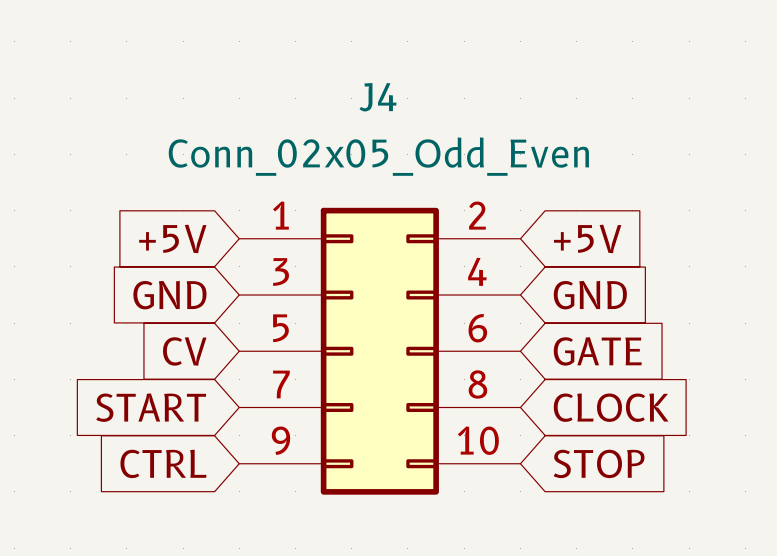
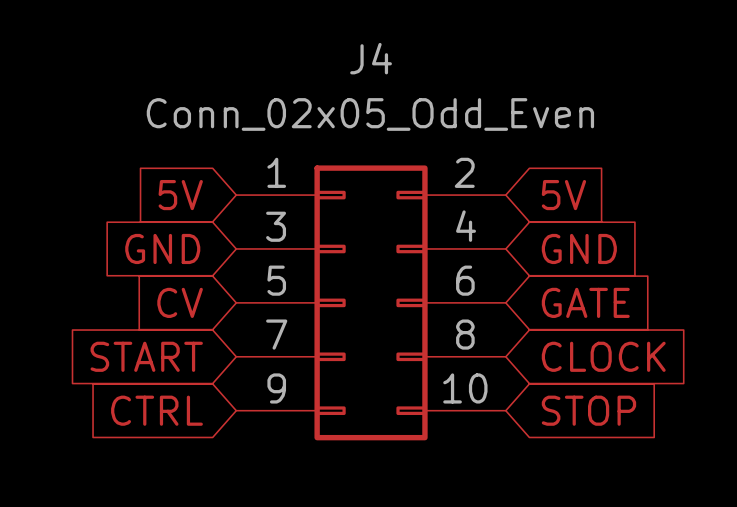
global label: +5V (172, 238) -> 5V (180, 195)
global label: +5V (587, 238) -> 5V (563, 195)

